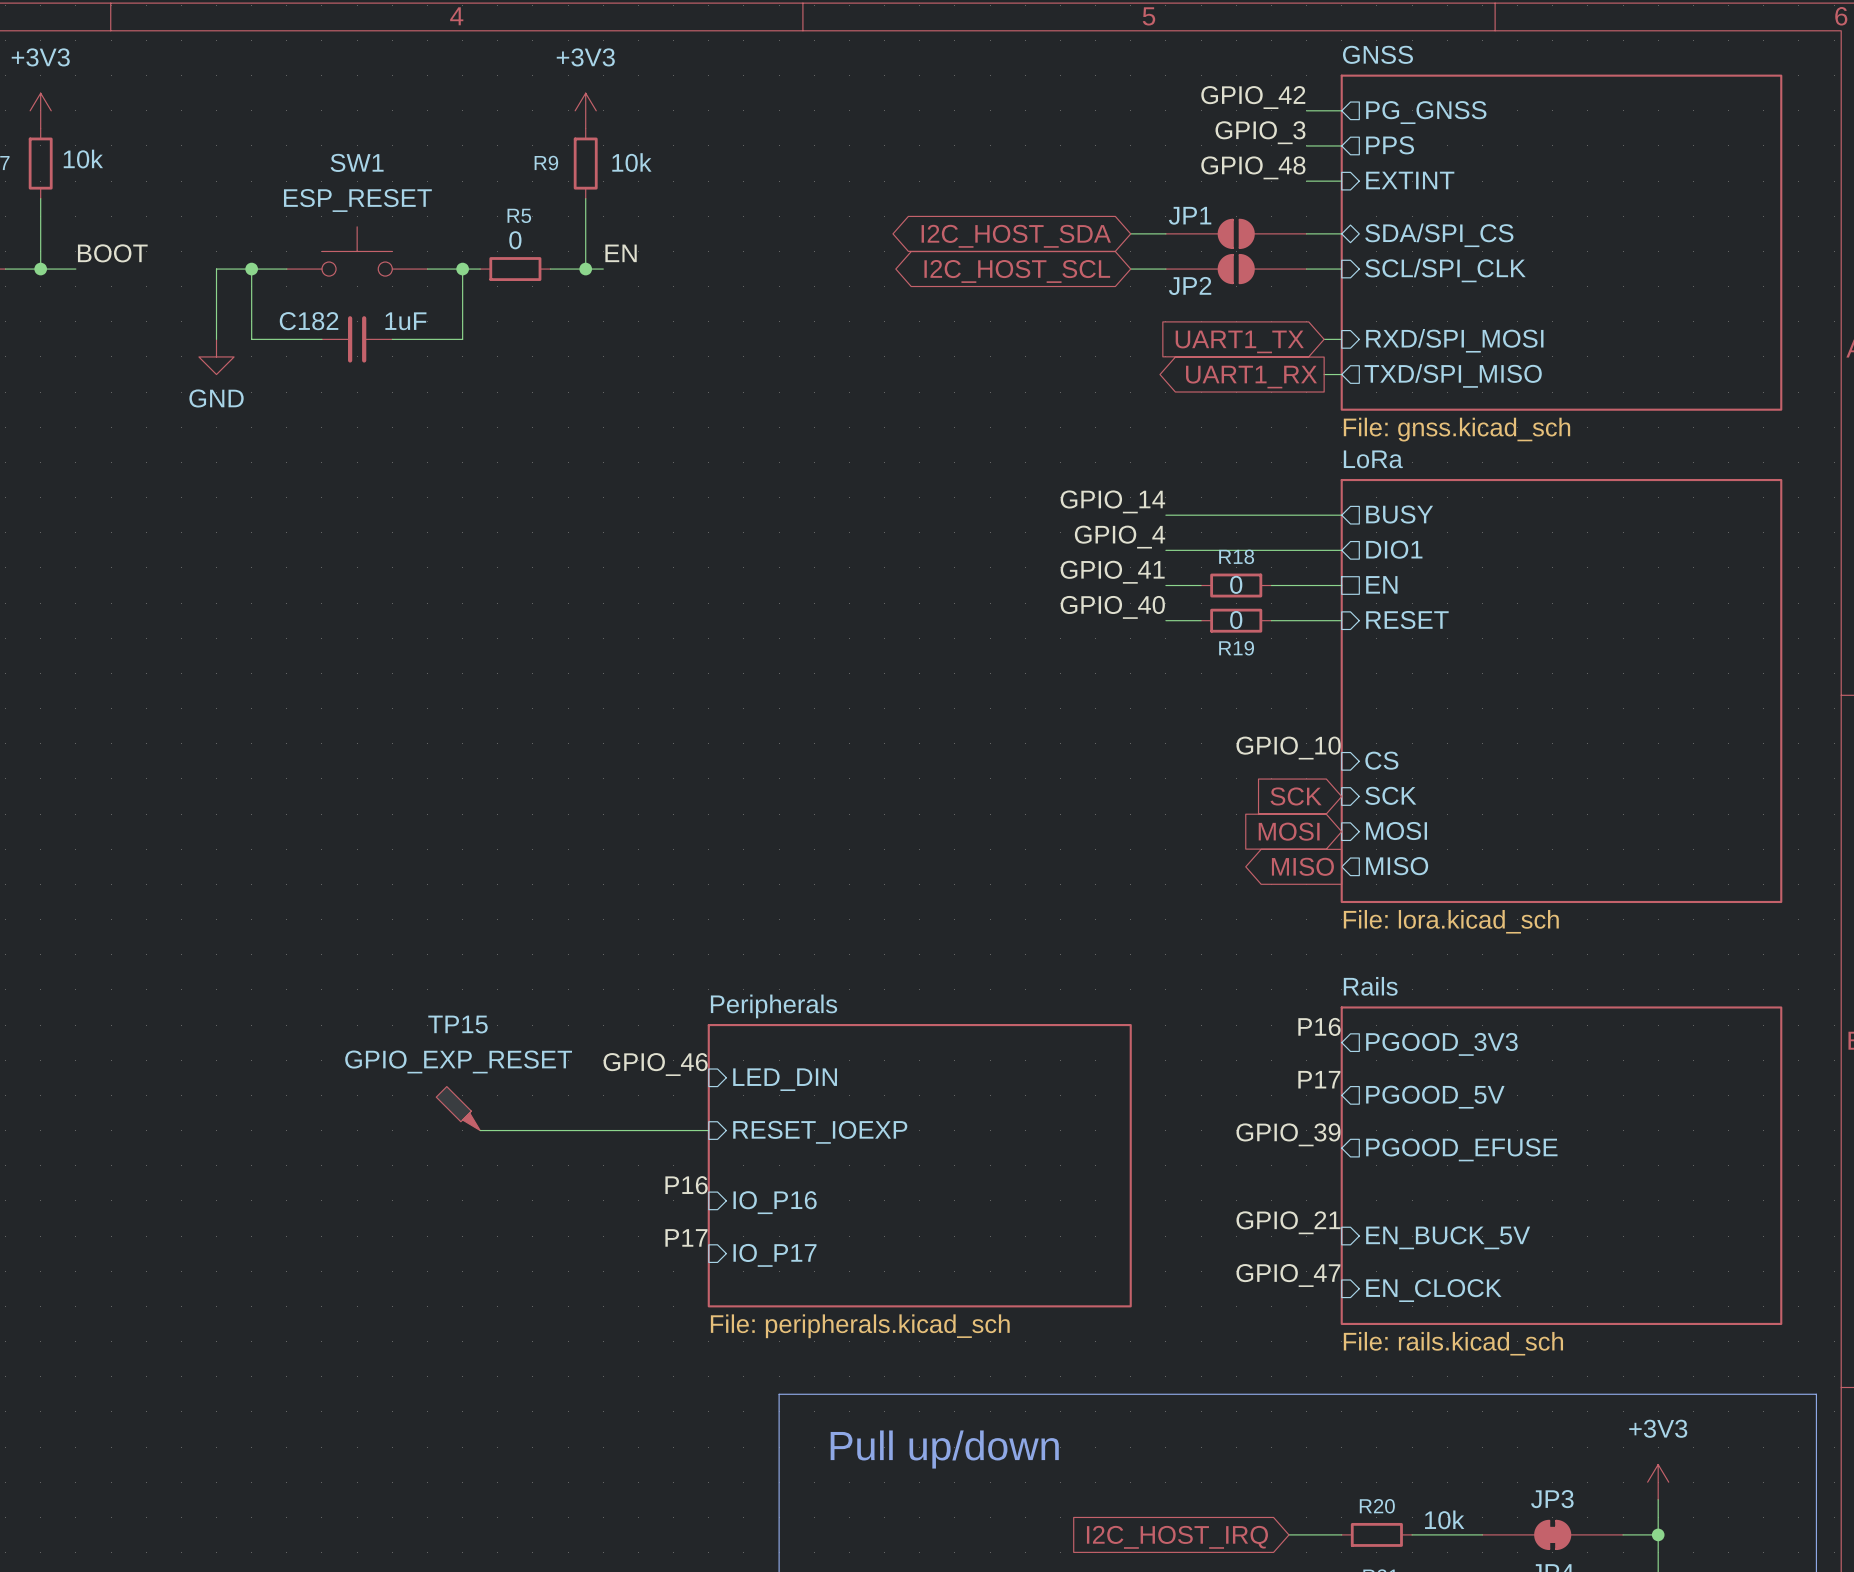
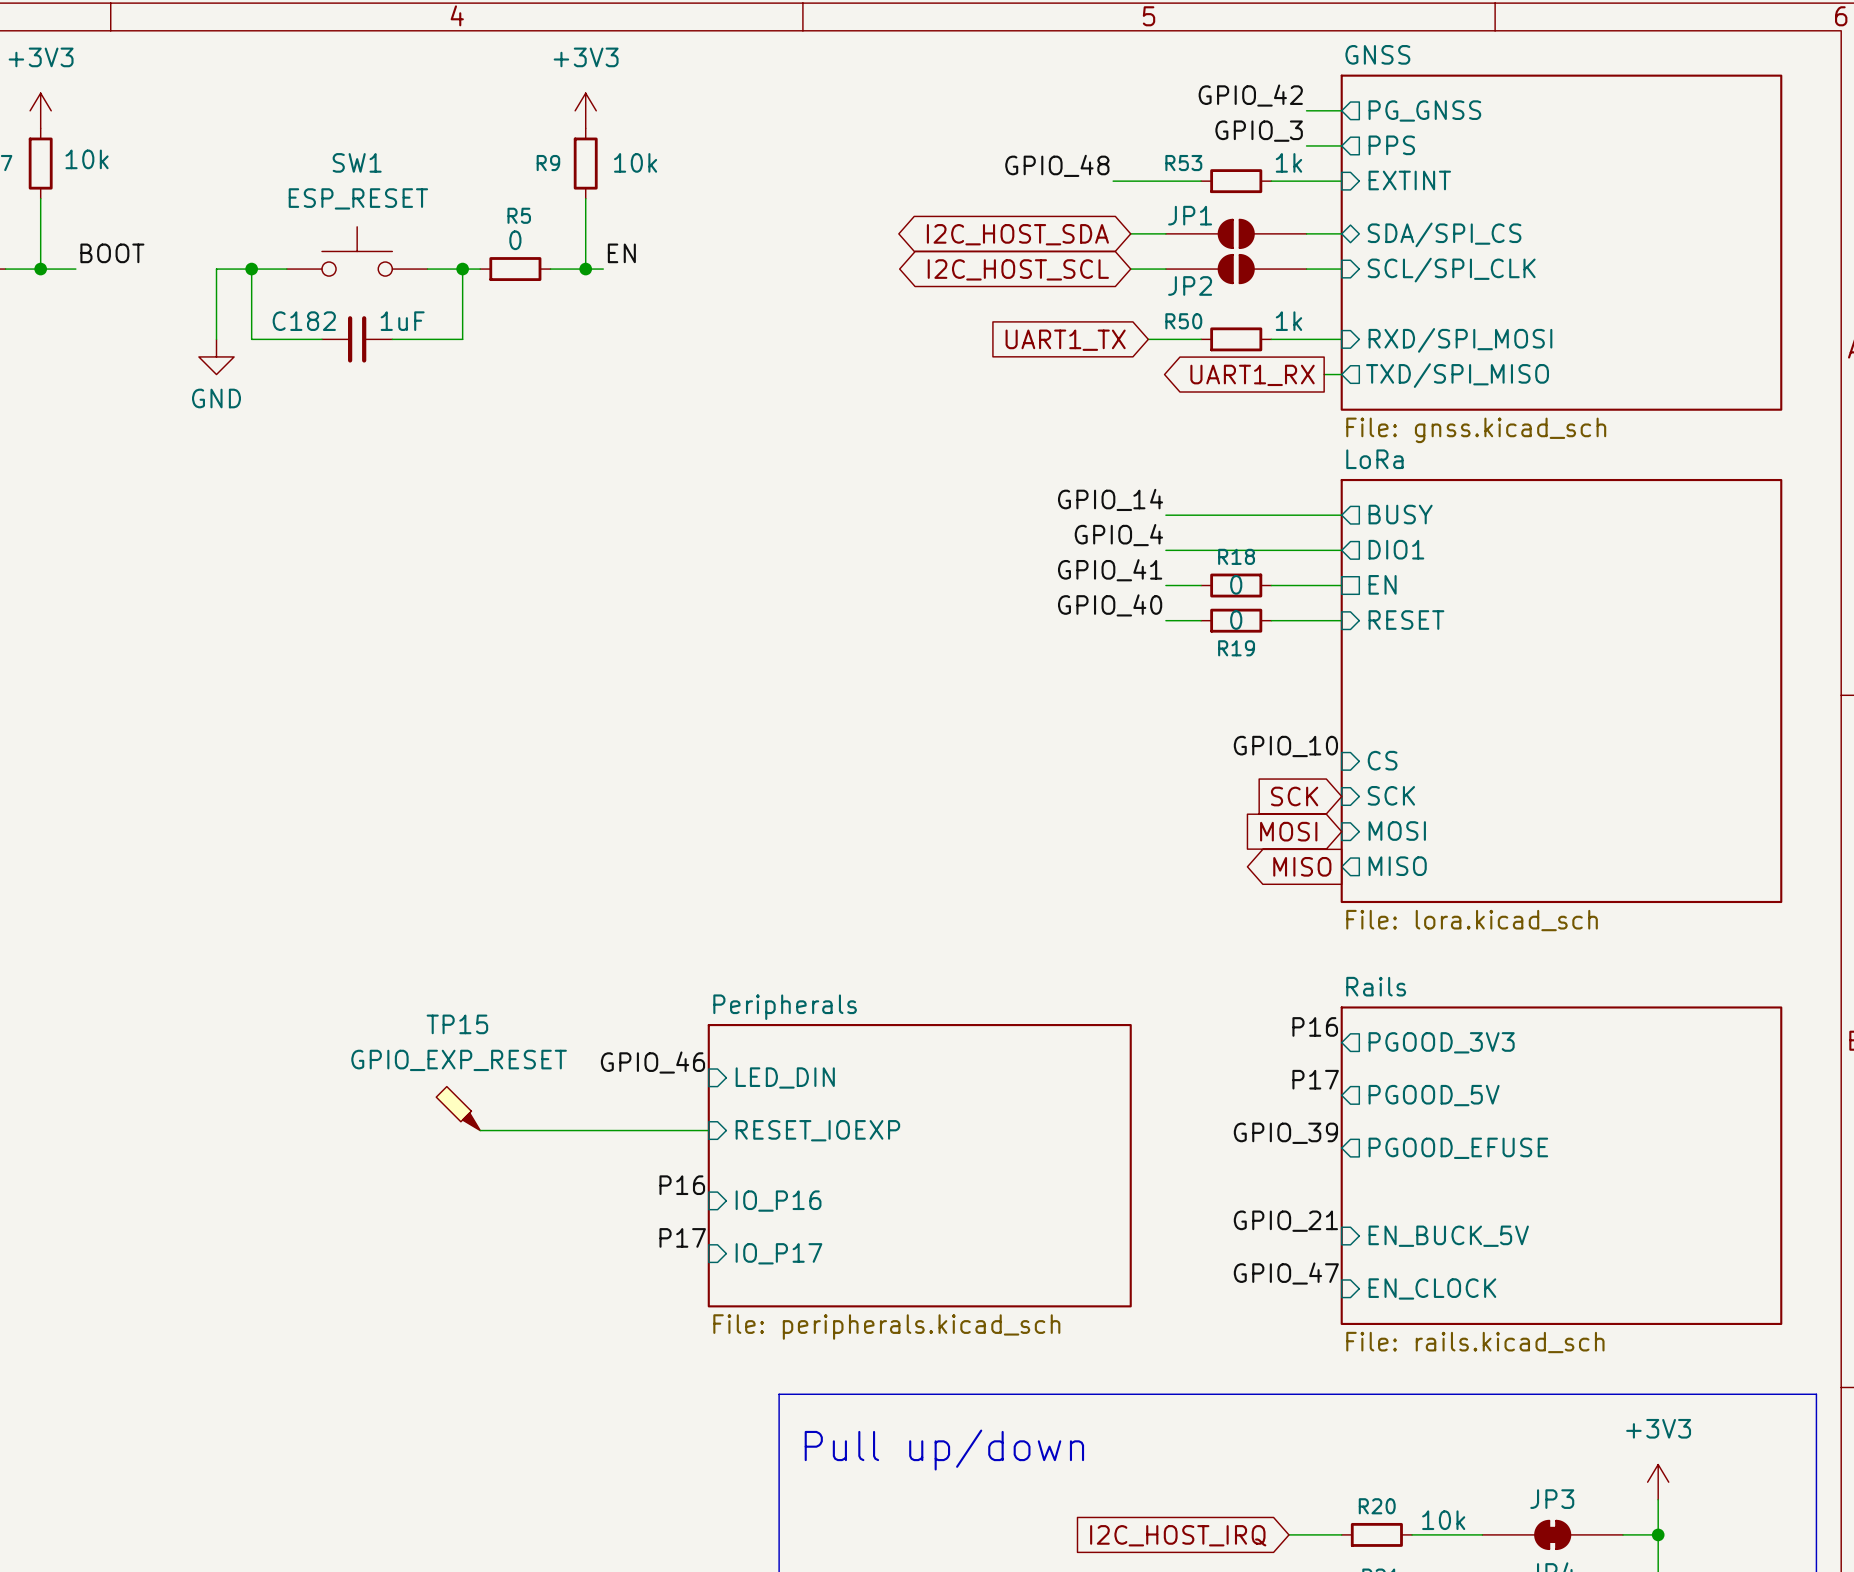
label position: GPIO_48 (1253, 167) -> GPIO_48 (1057, 165)
wire: none -> (1113, 181) (1201, 181)
R53: none -> 1k (1236, 181)
wire: none -> (1271, 181) (1306, 181)
wire: none -> (1148, 339) (1201, 339)
R50: none -> 1k (1236, 339)
wire: none -> (1271, 339) (1324, 339)
global label position: UART1_TX (1239, 341) -> UART1_TX (1065, 340)

